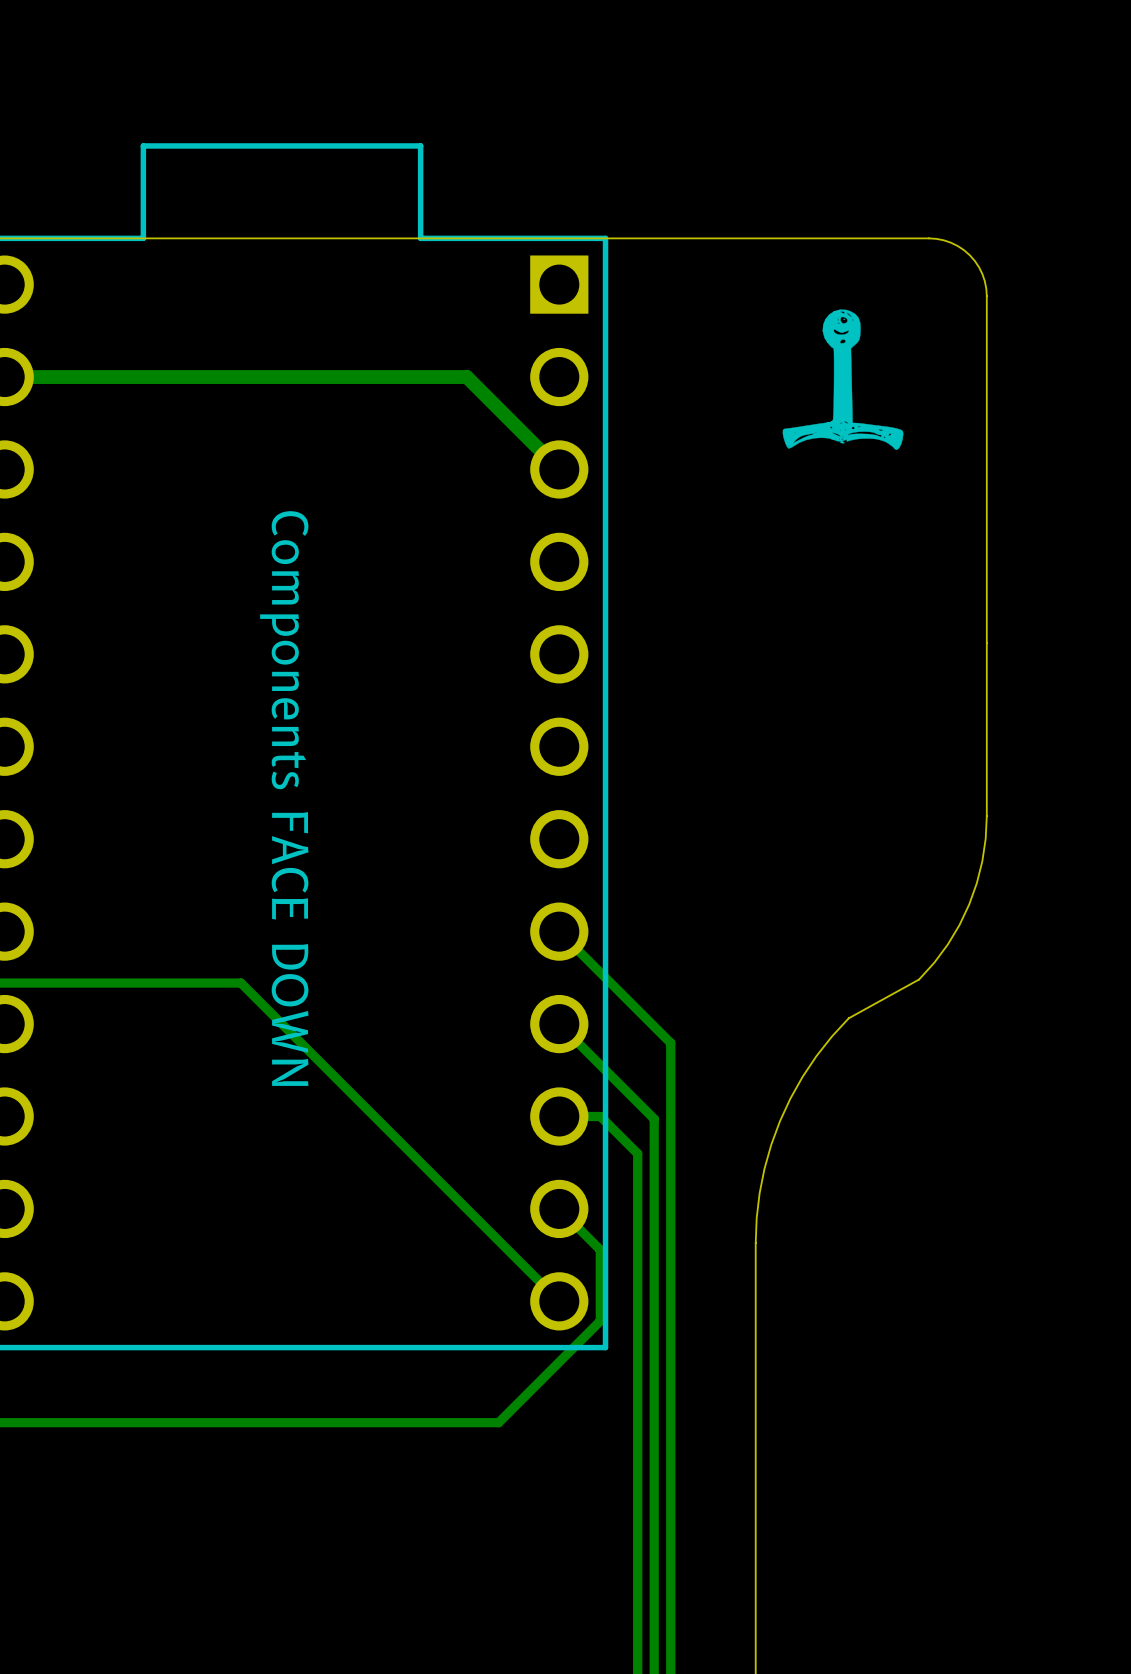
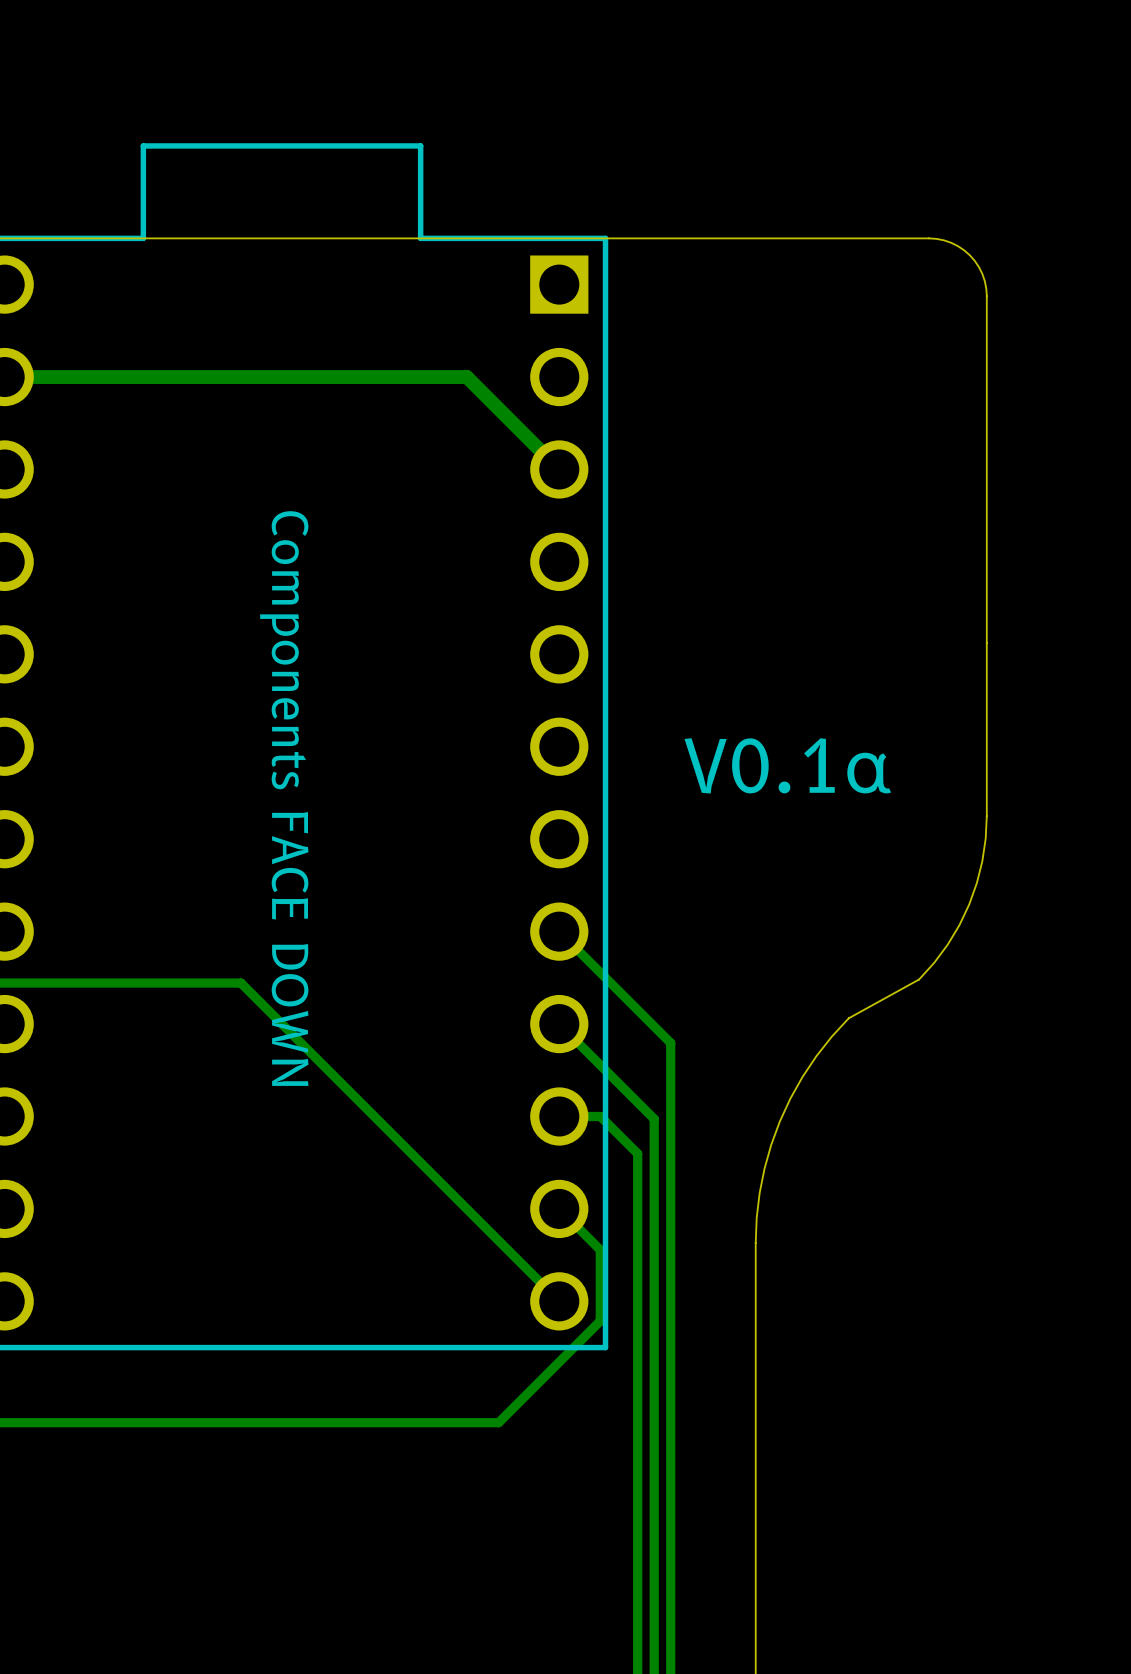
drawing: [782, 309, 904, 450] -> none
text: none -> V0.1α (787, 765)

